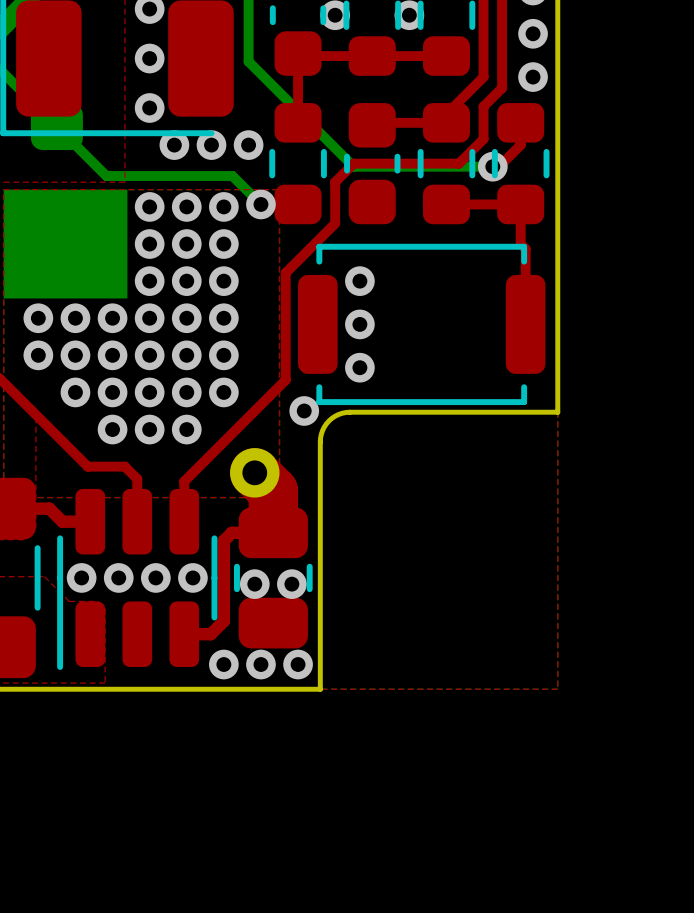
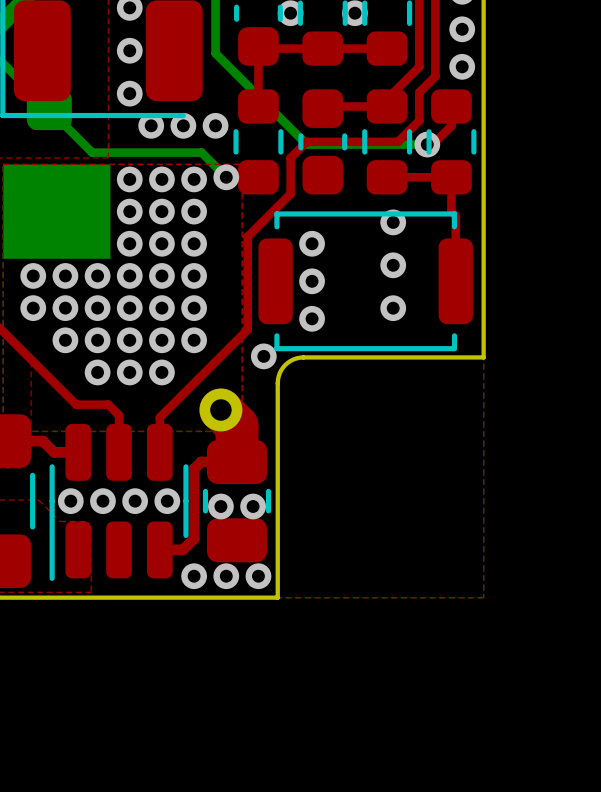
via: none -> (393, 222)
via: none -> (393, 265)
via: none -> (393, 308)

